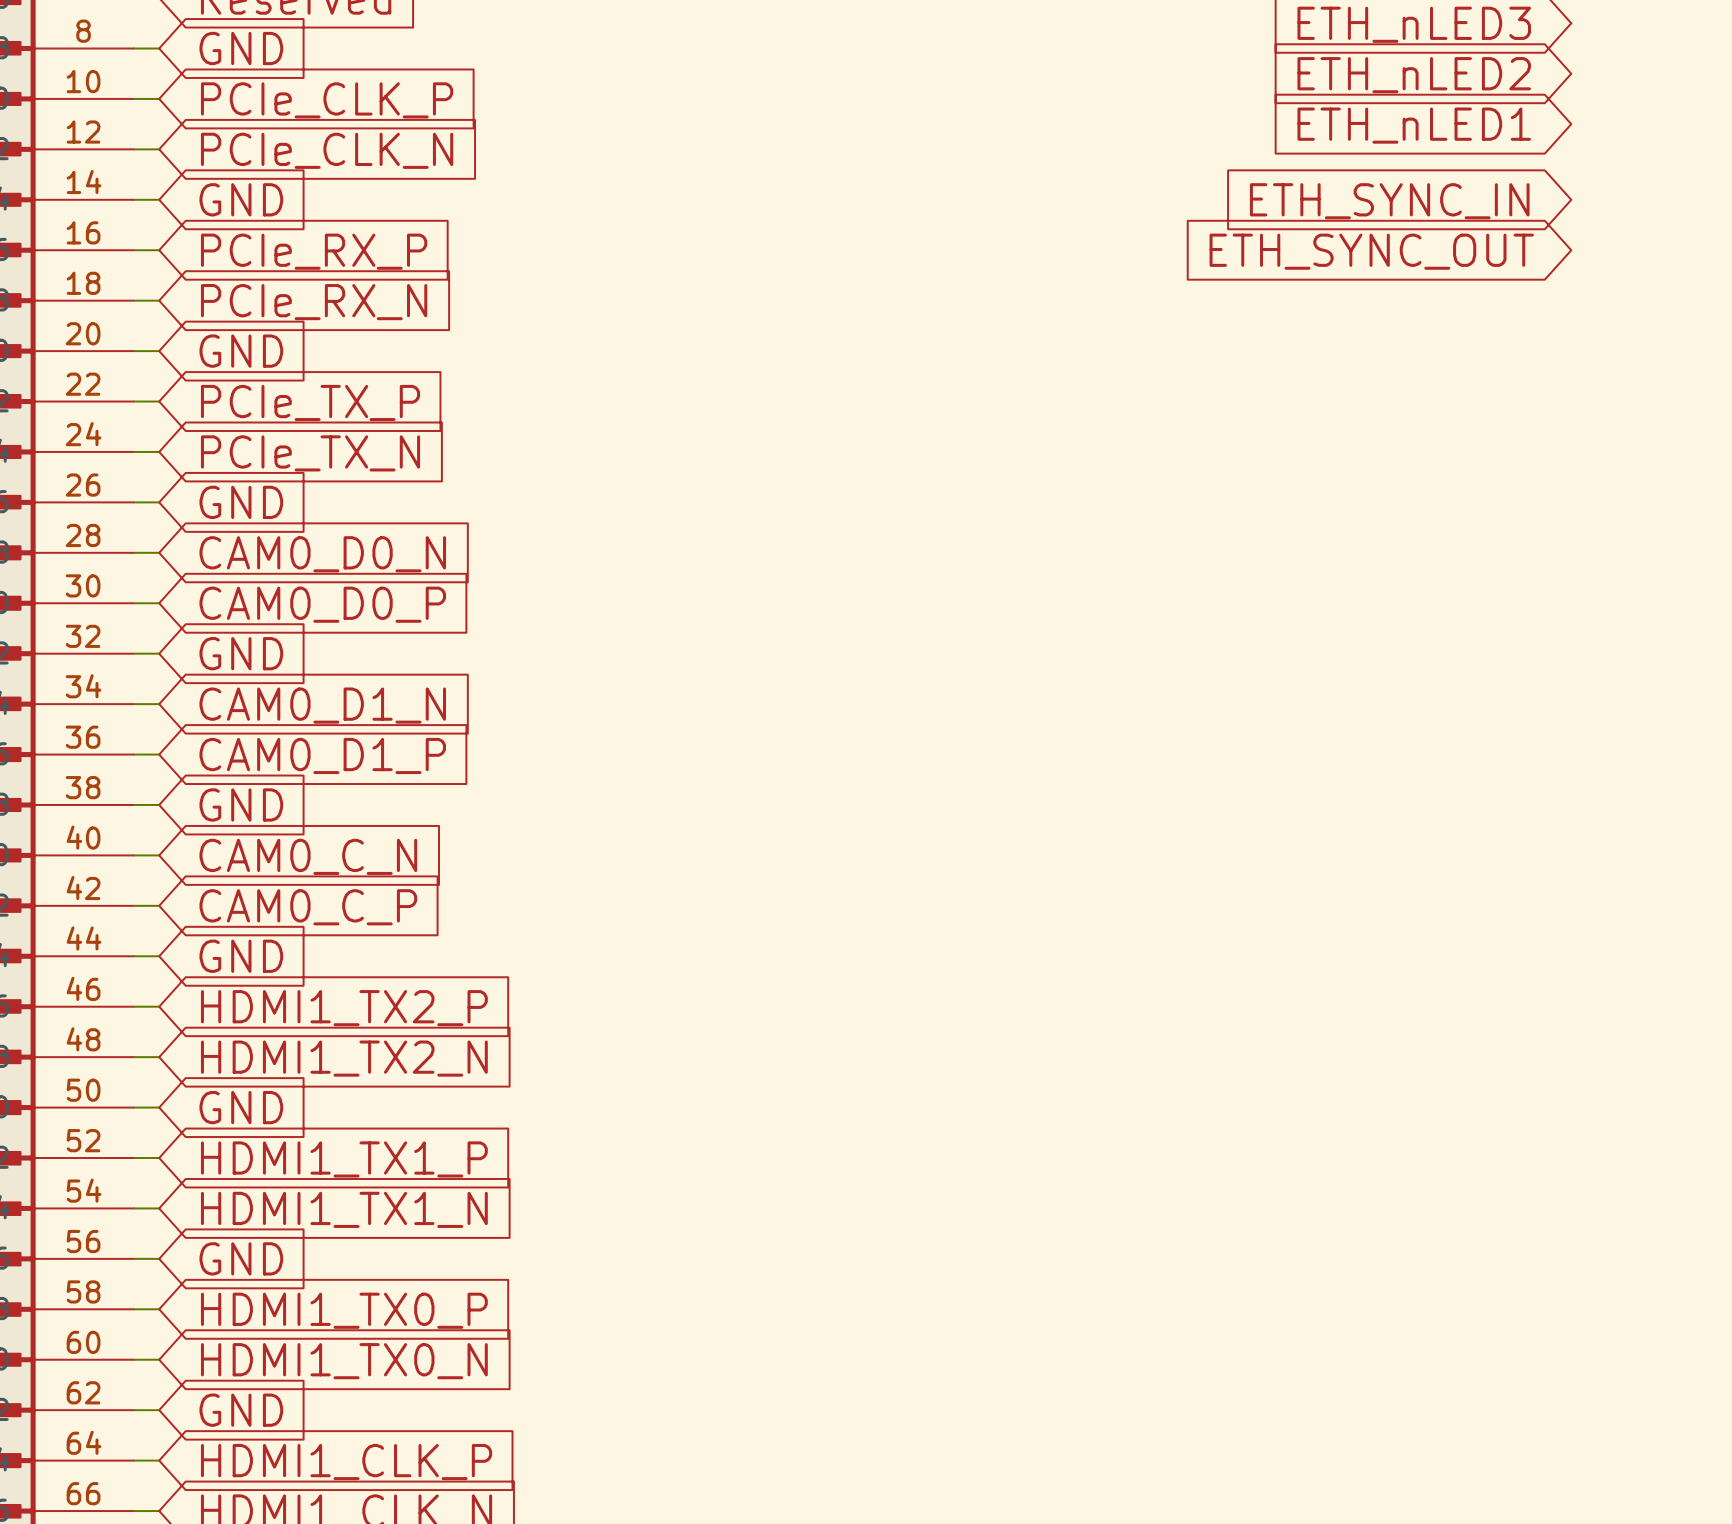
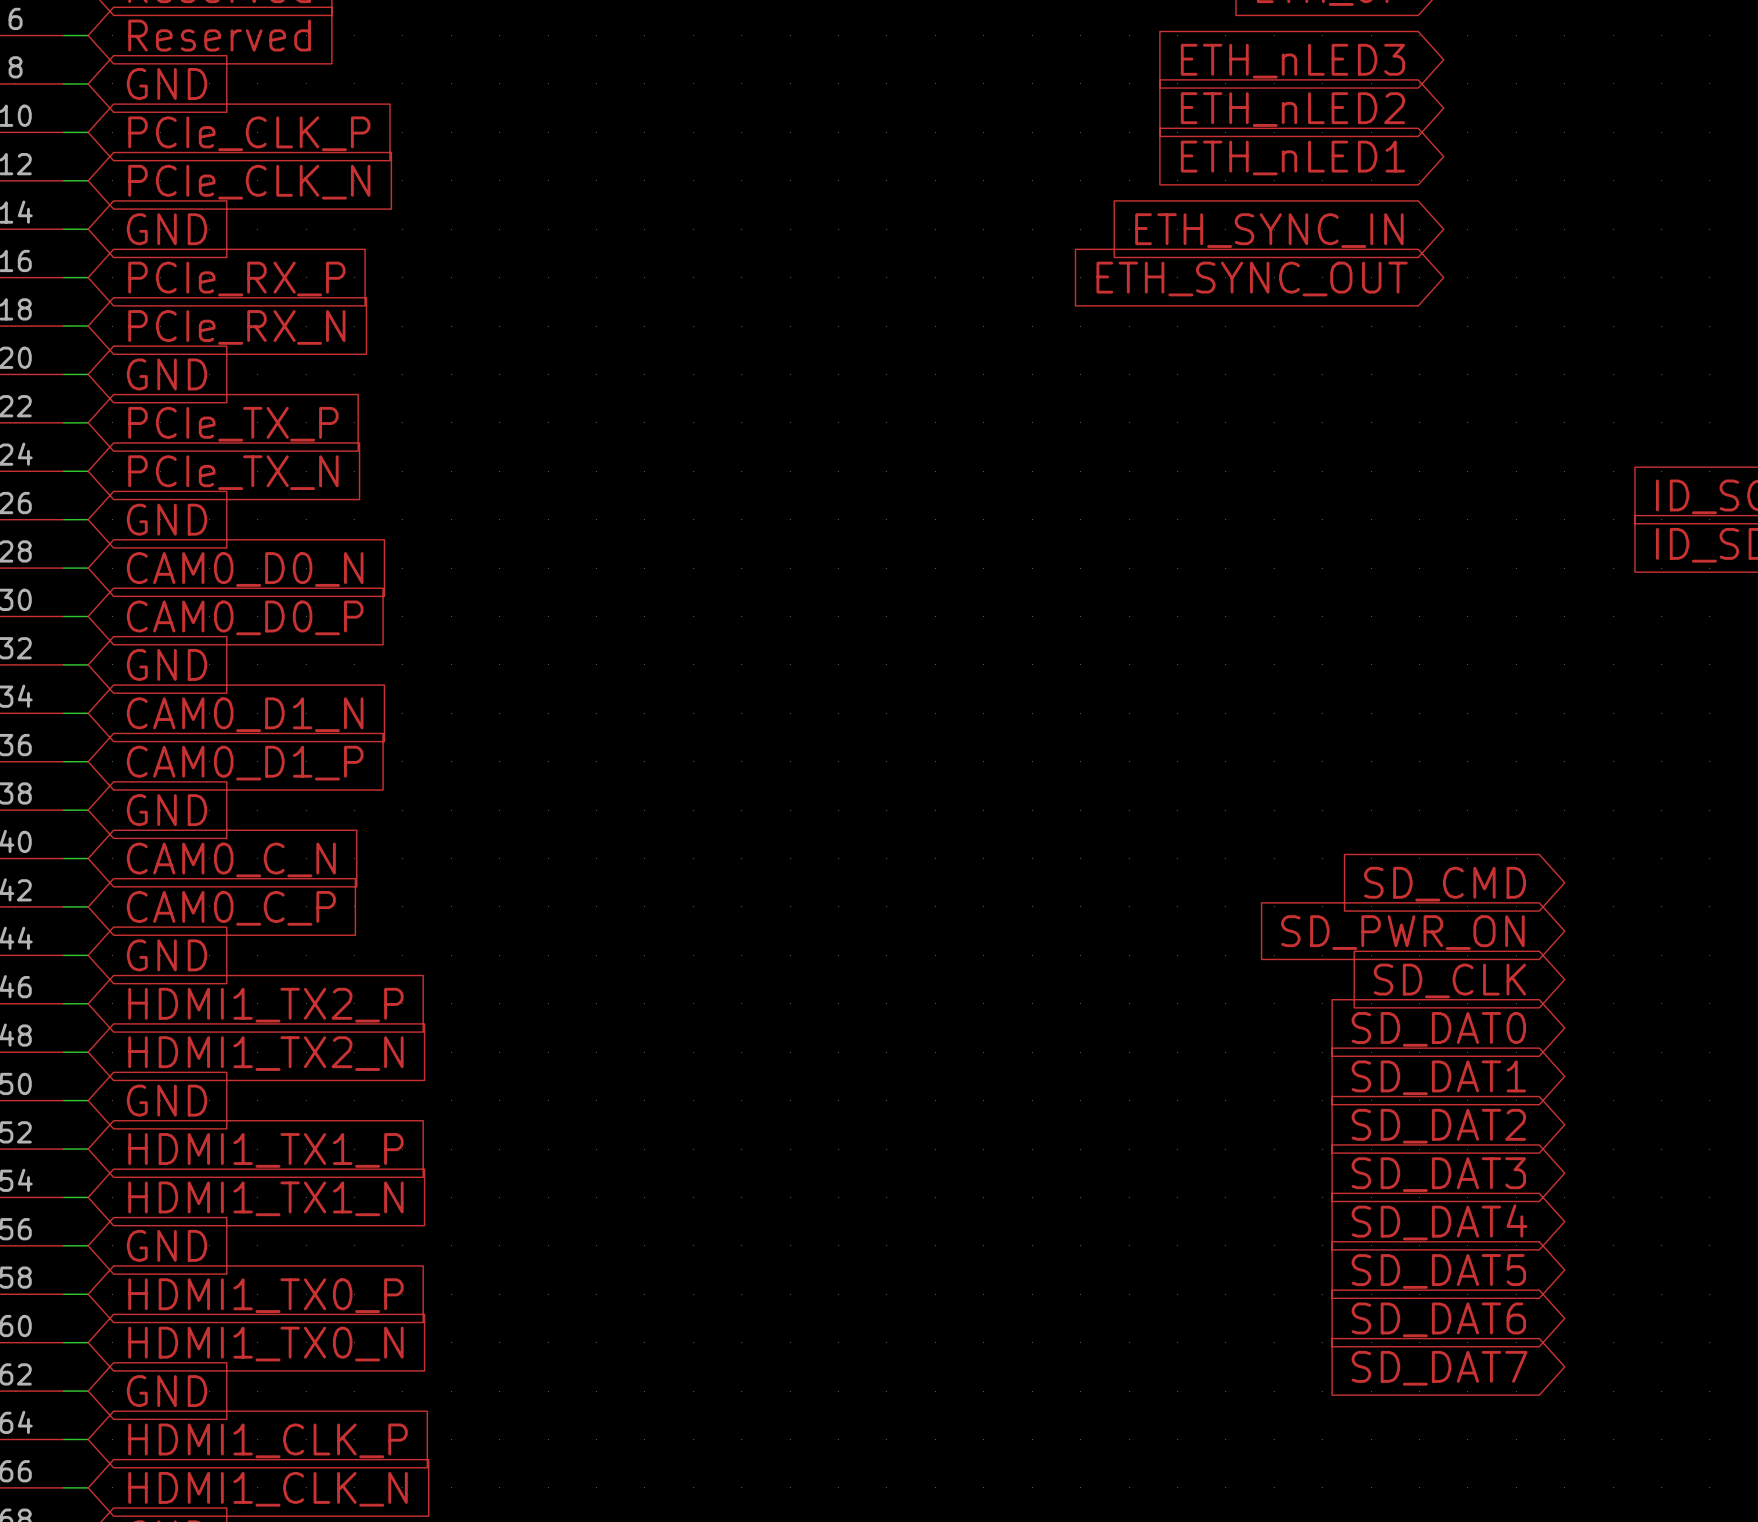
global label: none -> SD_CMD (1445, 884)
global label: none -> SD_PWR_ON (1402, 932)
global label: none -> SD_CLK (1449, 980)
global label: none -> SD_DAT0 (1438, 1029)
global label: none -> SD_DAT1 (1438, 1077)
global label: none -> SD_DAT2 (1438, 1126)
global label: none -> SD_DAT3 (1438, 1174)
global label: none -> SD_DAT4 (1439, 1222)
global label: none -> SD_DAT5 (1438, 1271)
global label: none -> SD_DAT6 (1438, 1319)
global label: none -> SD_DAT7 (1439, 1368)

